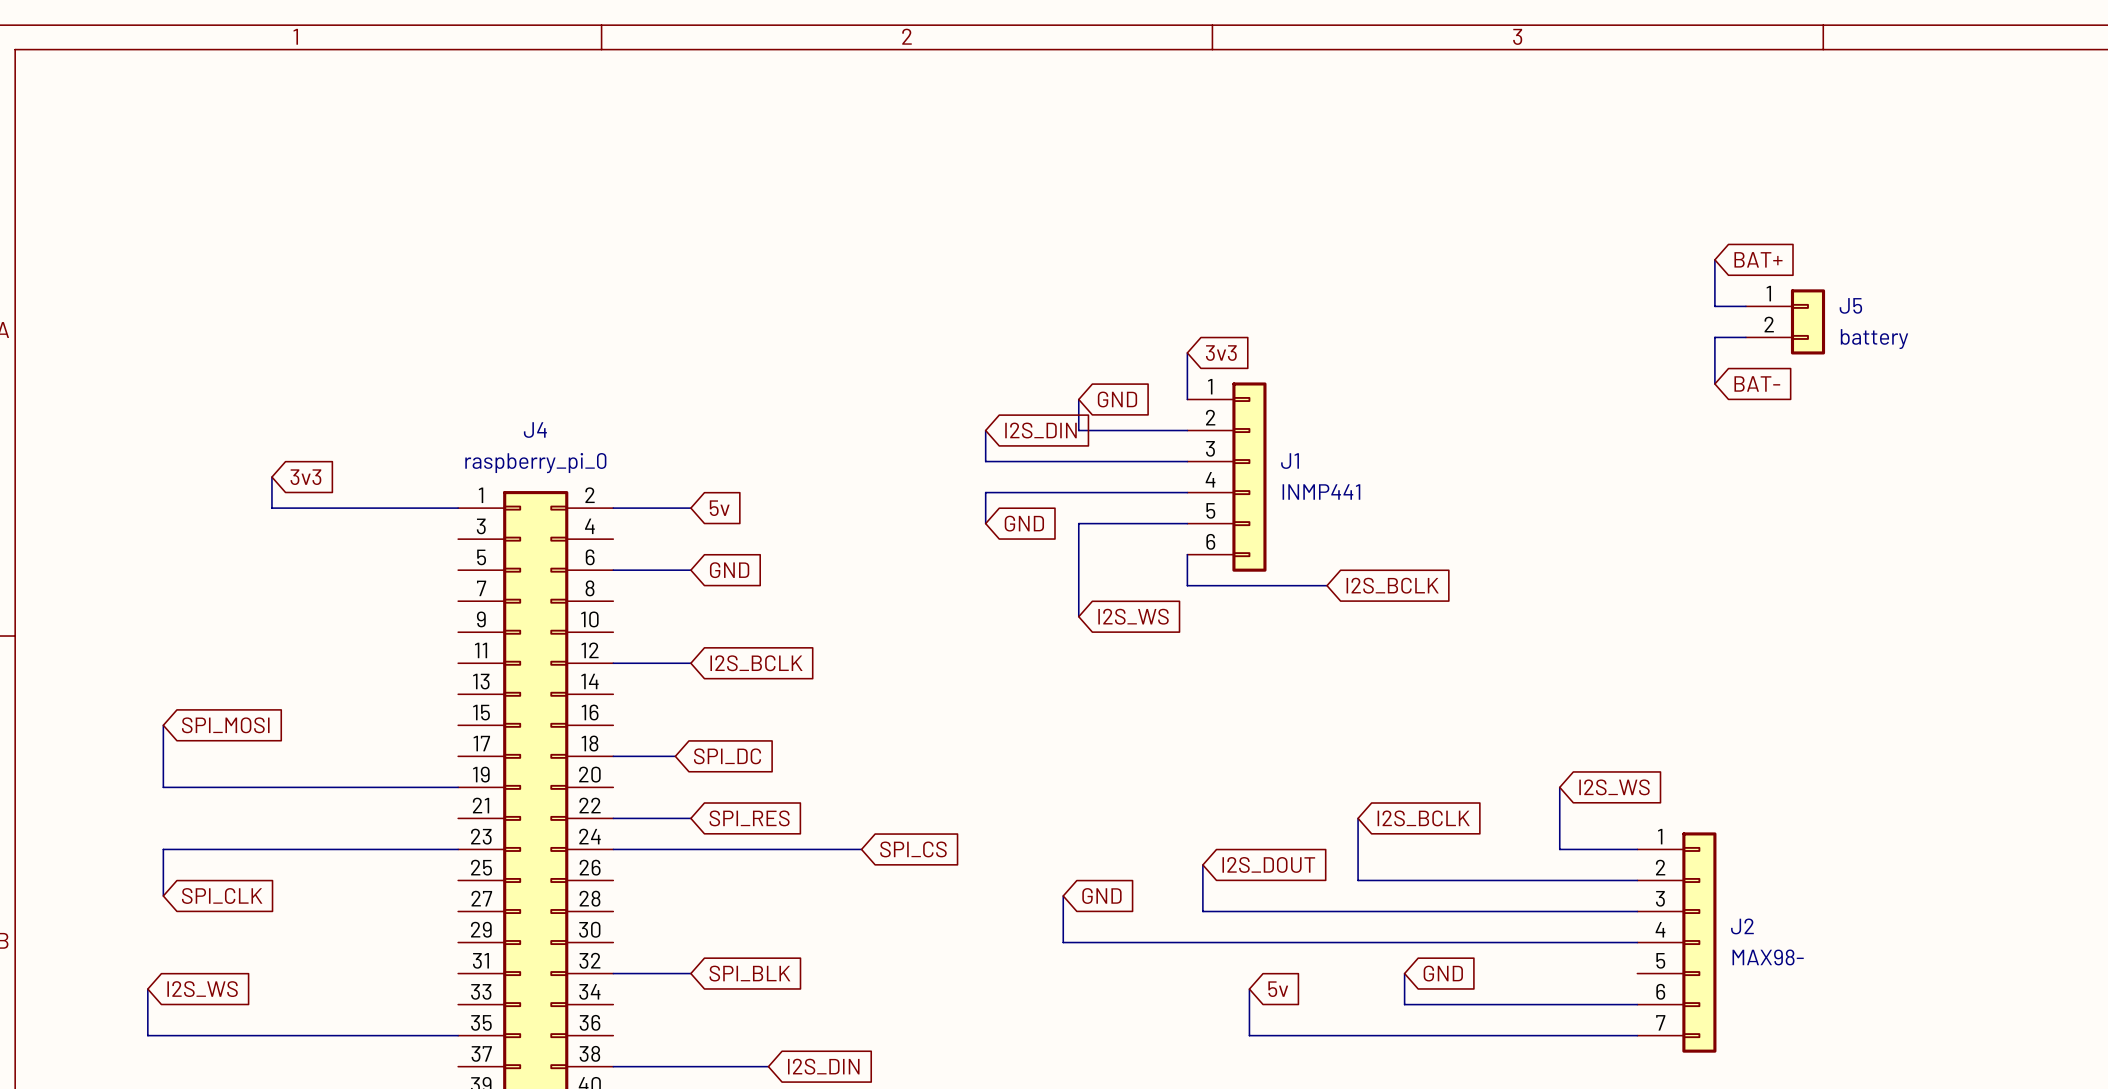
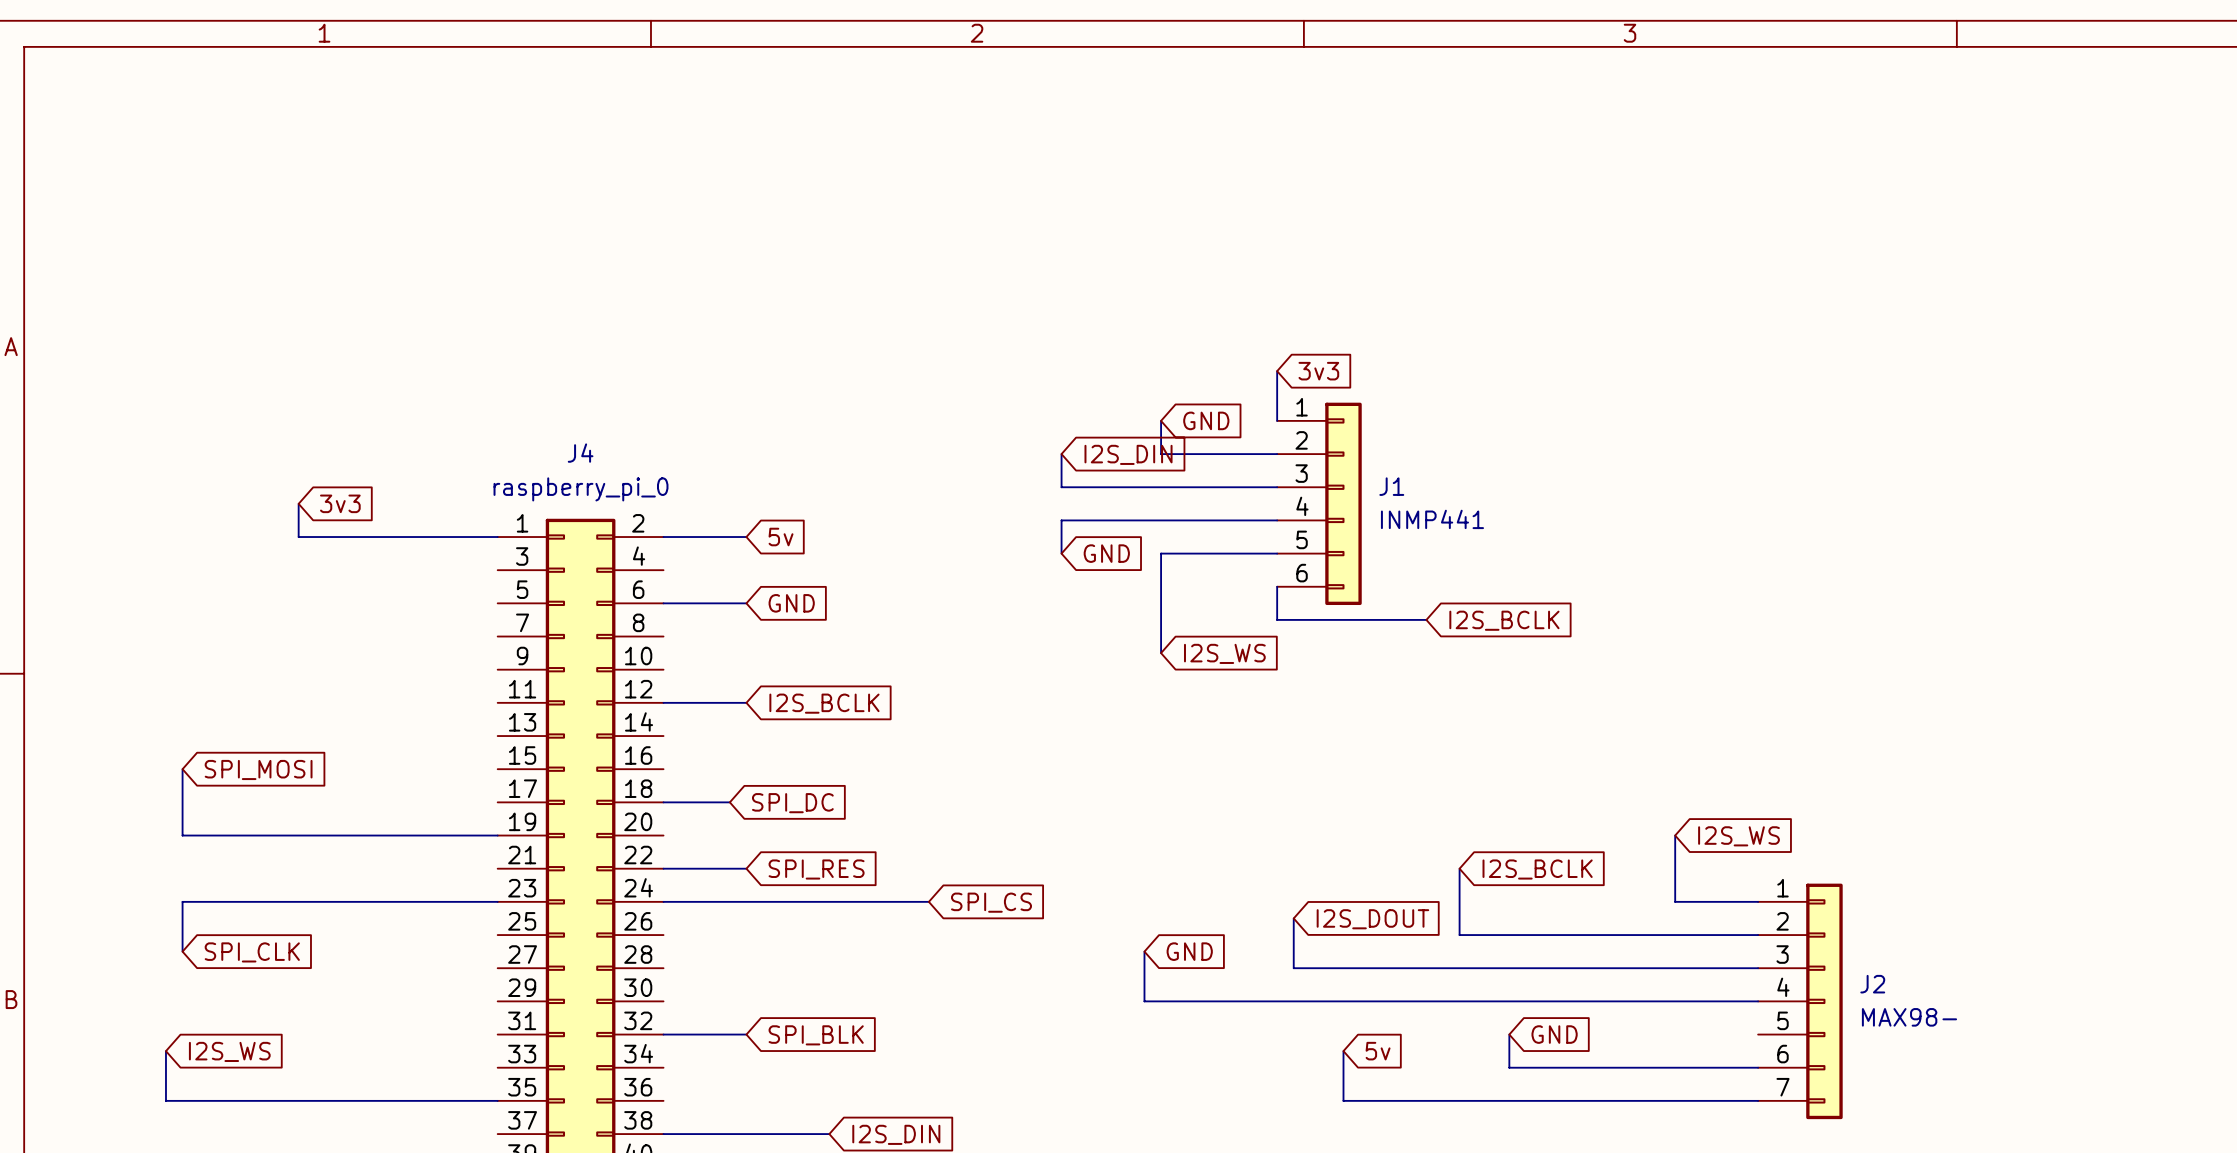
wire: (1714, 259) (1714, 306) (1745, 306) -> none
global label: BAT+ (1758, 259) -> none
J5: battery (1785, 321) -> none
wire: (1745, 337) (1714, 337) (1714, 383) -> none
global label: BAT- (1757, 383) -> none

